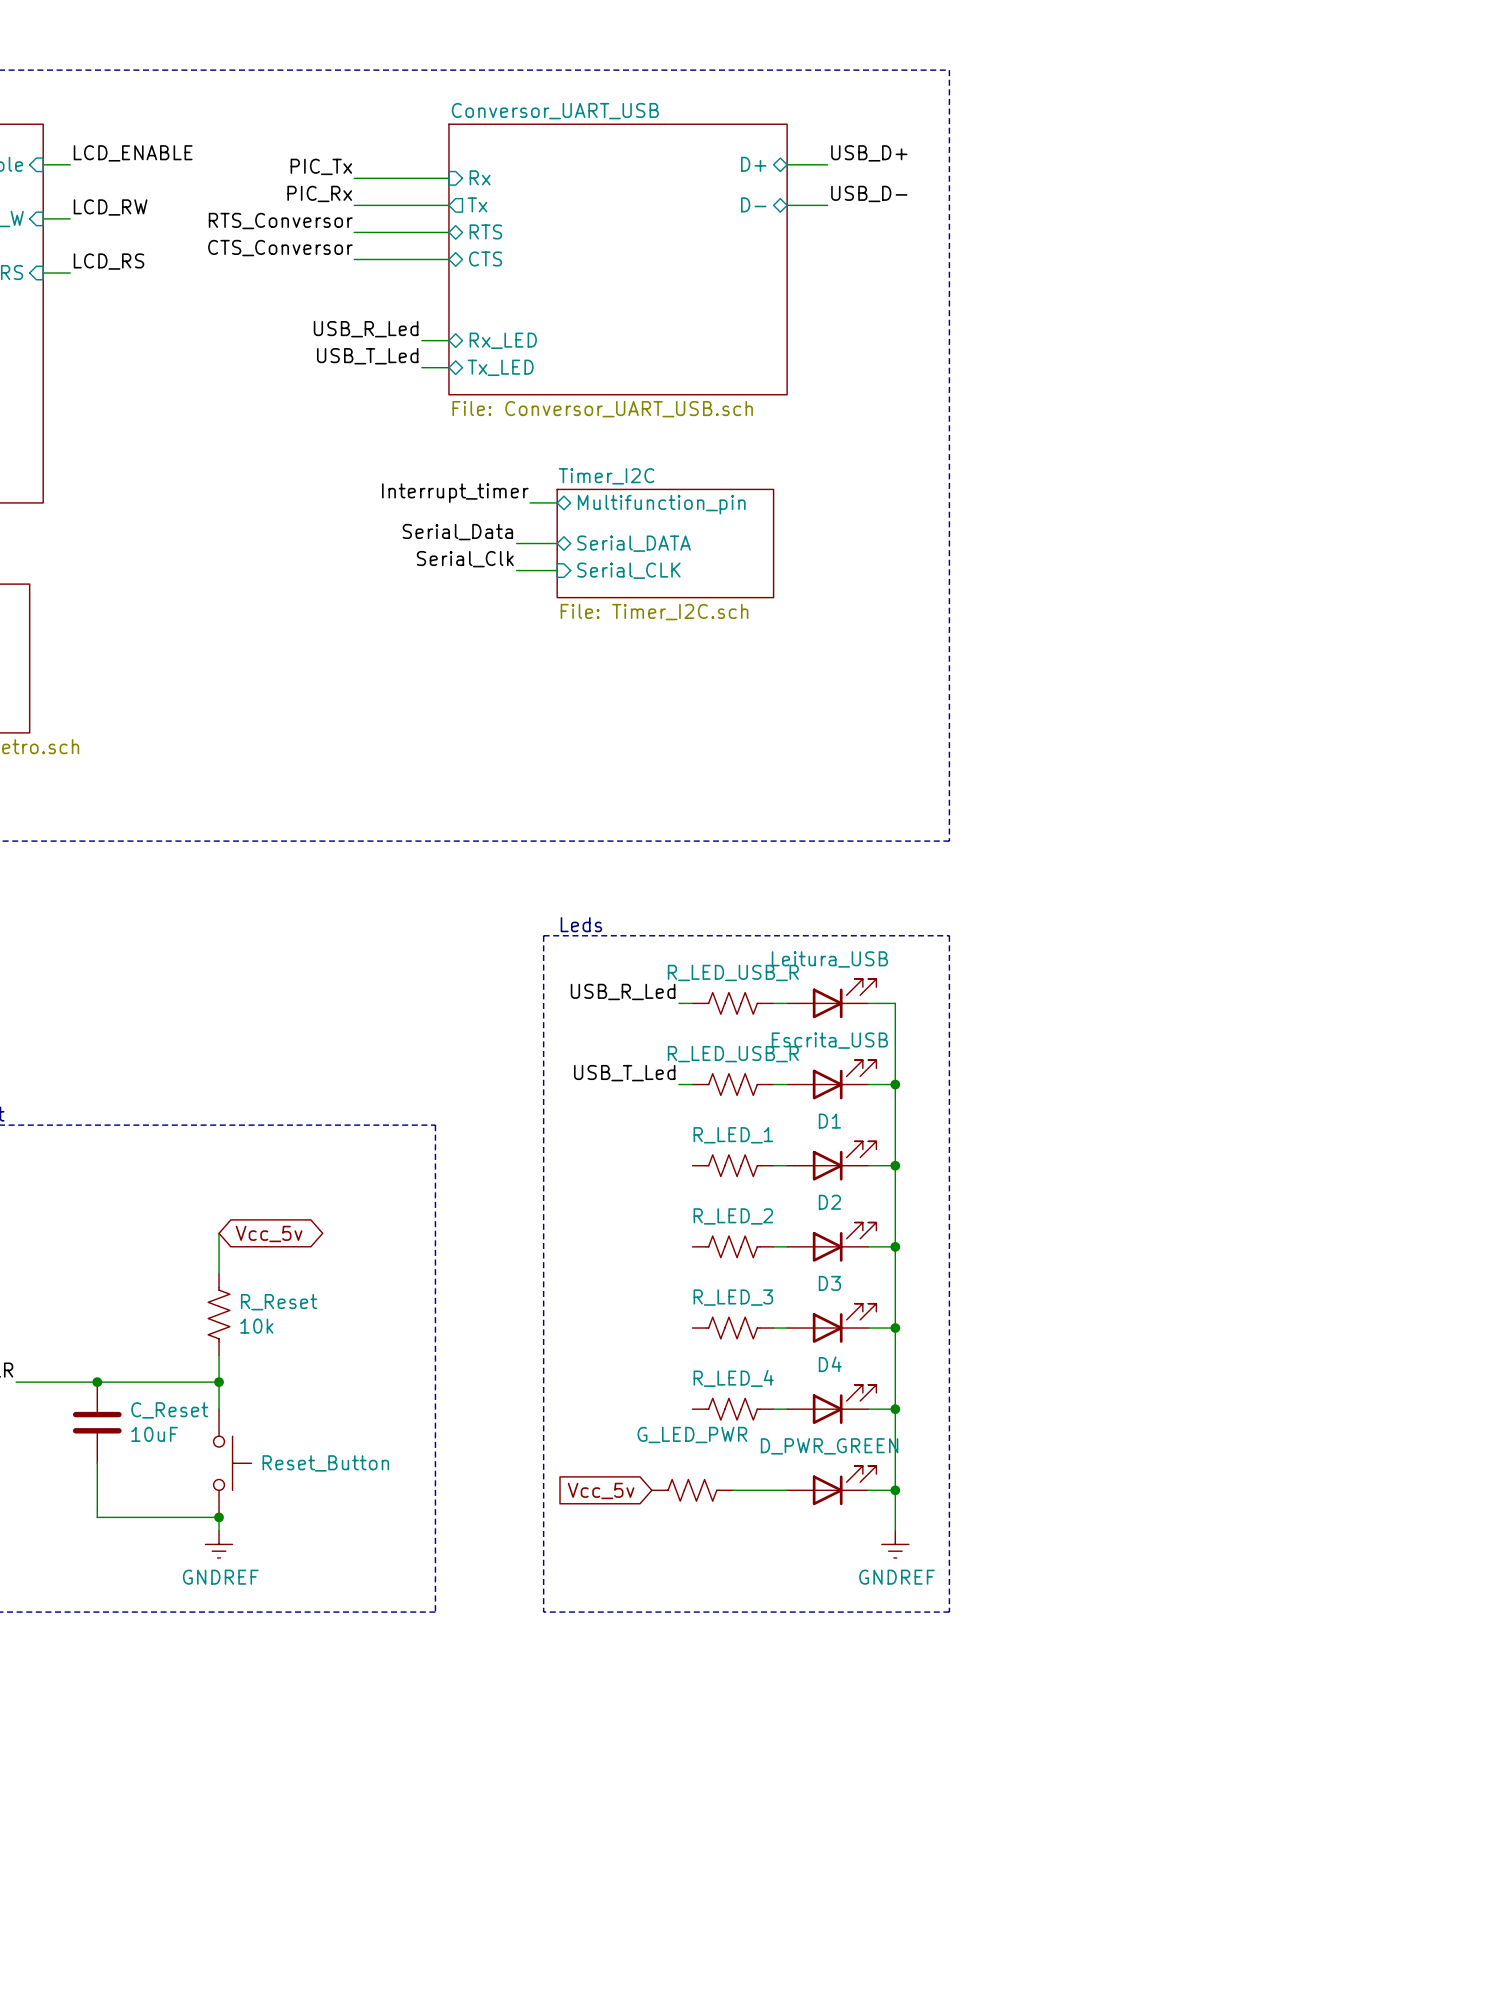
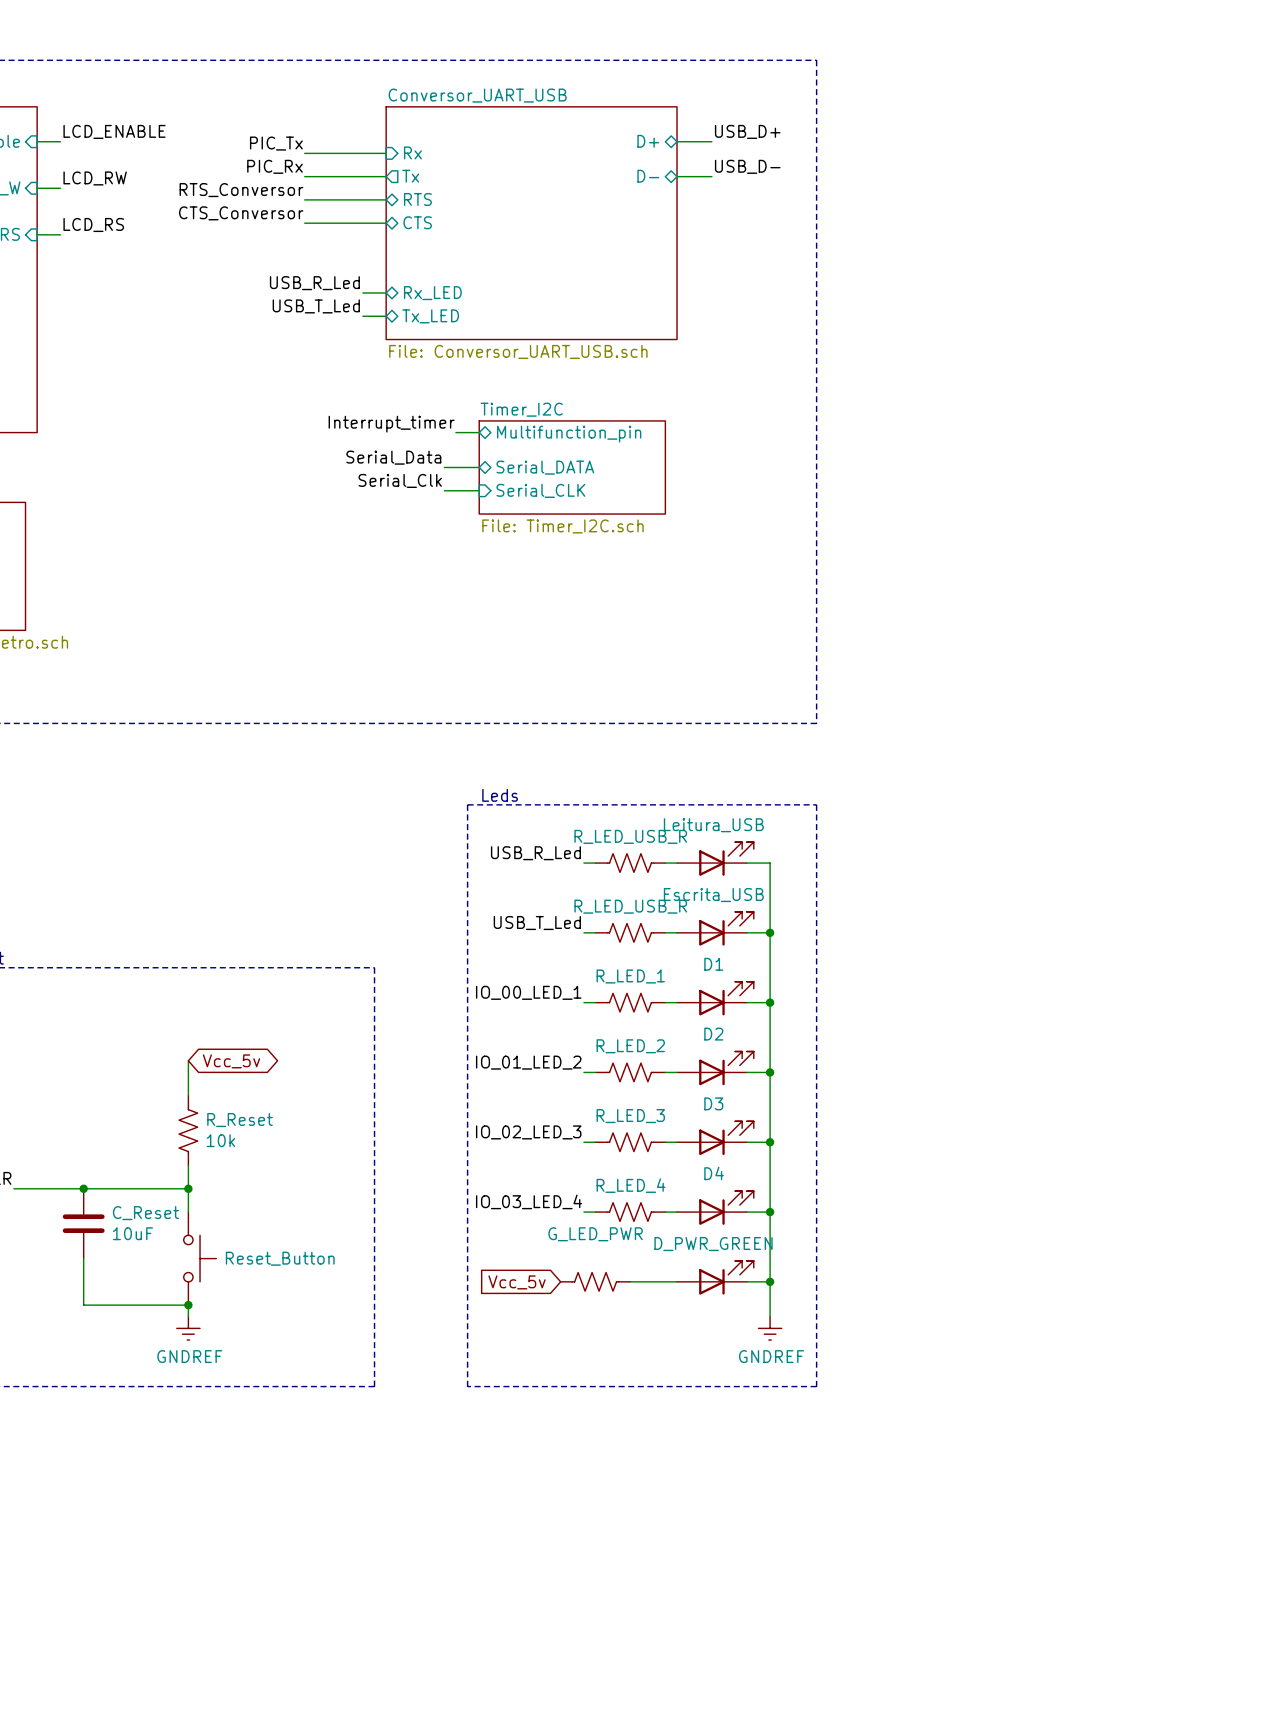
label: none -> IO_00_LED_1 (528, 992)
wire: none -> (583, 1002) (595, 1002)
label: none -> IO_01_LED_2 (528, 1062)
wire: none -> (583, 1072) (595, 1072)
label: none -> IO_02_LED_3 (528, 1132)
wire: none -> (583, 1142) (595, 1142)
label: none -> IO_03_LED_4 (529, 1201)
wire: none -> (583, 1212) (595, 1212)

